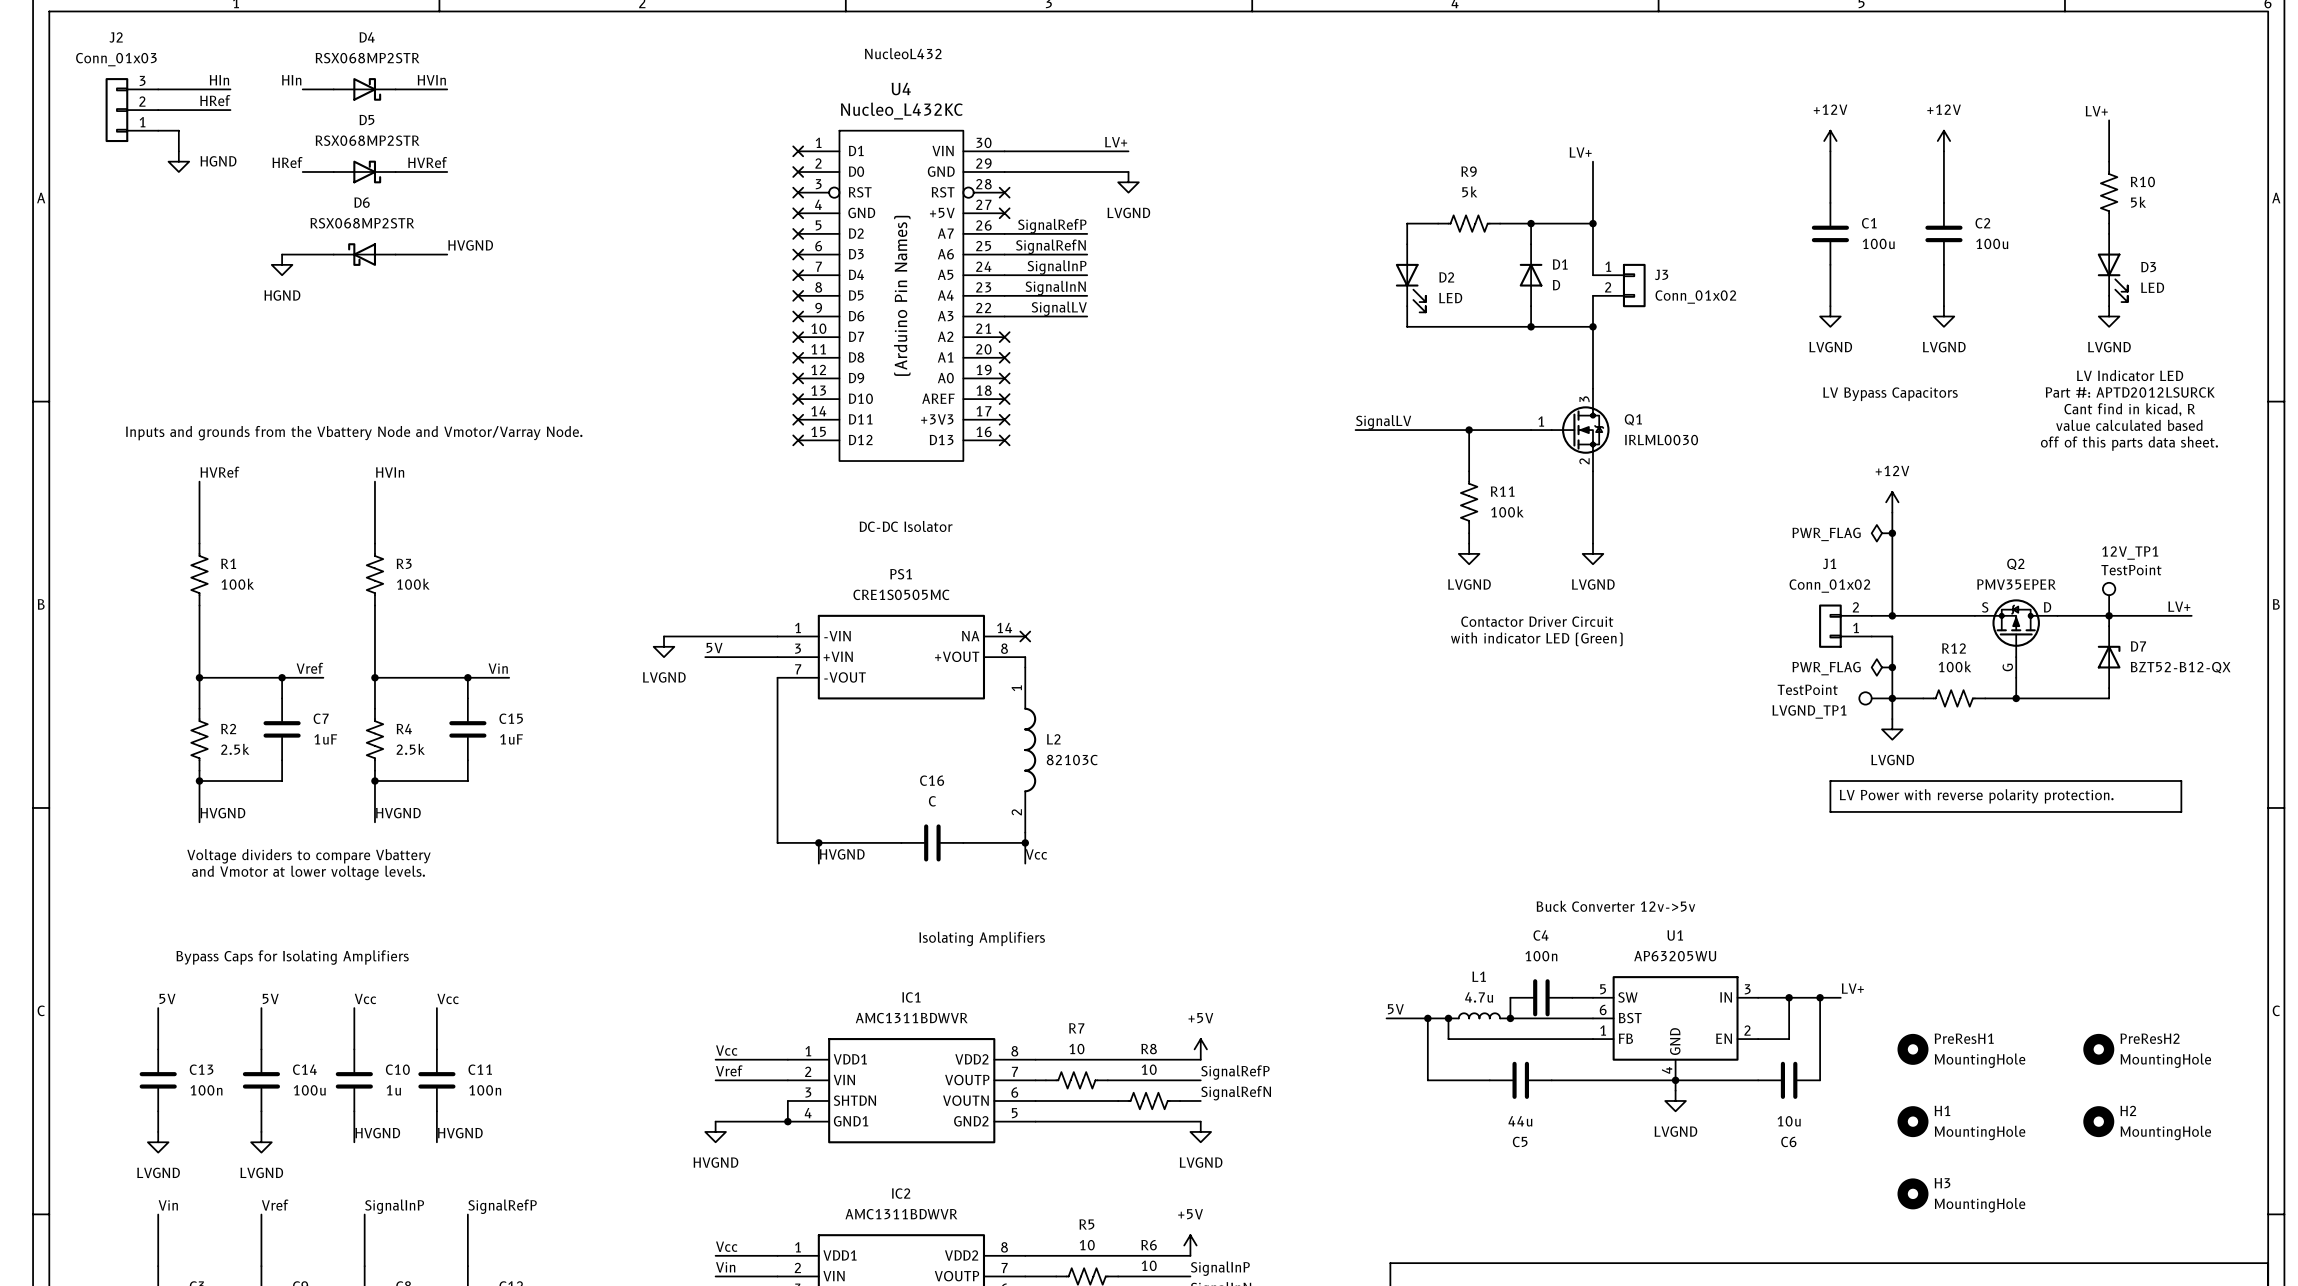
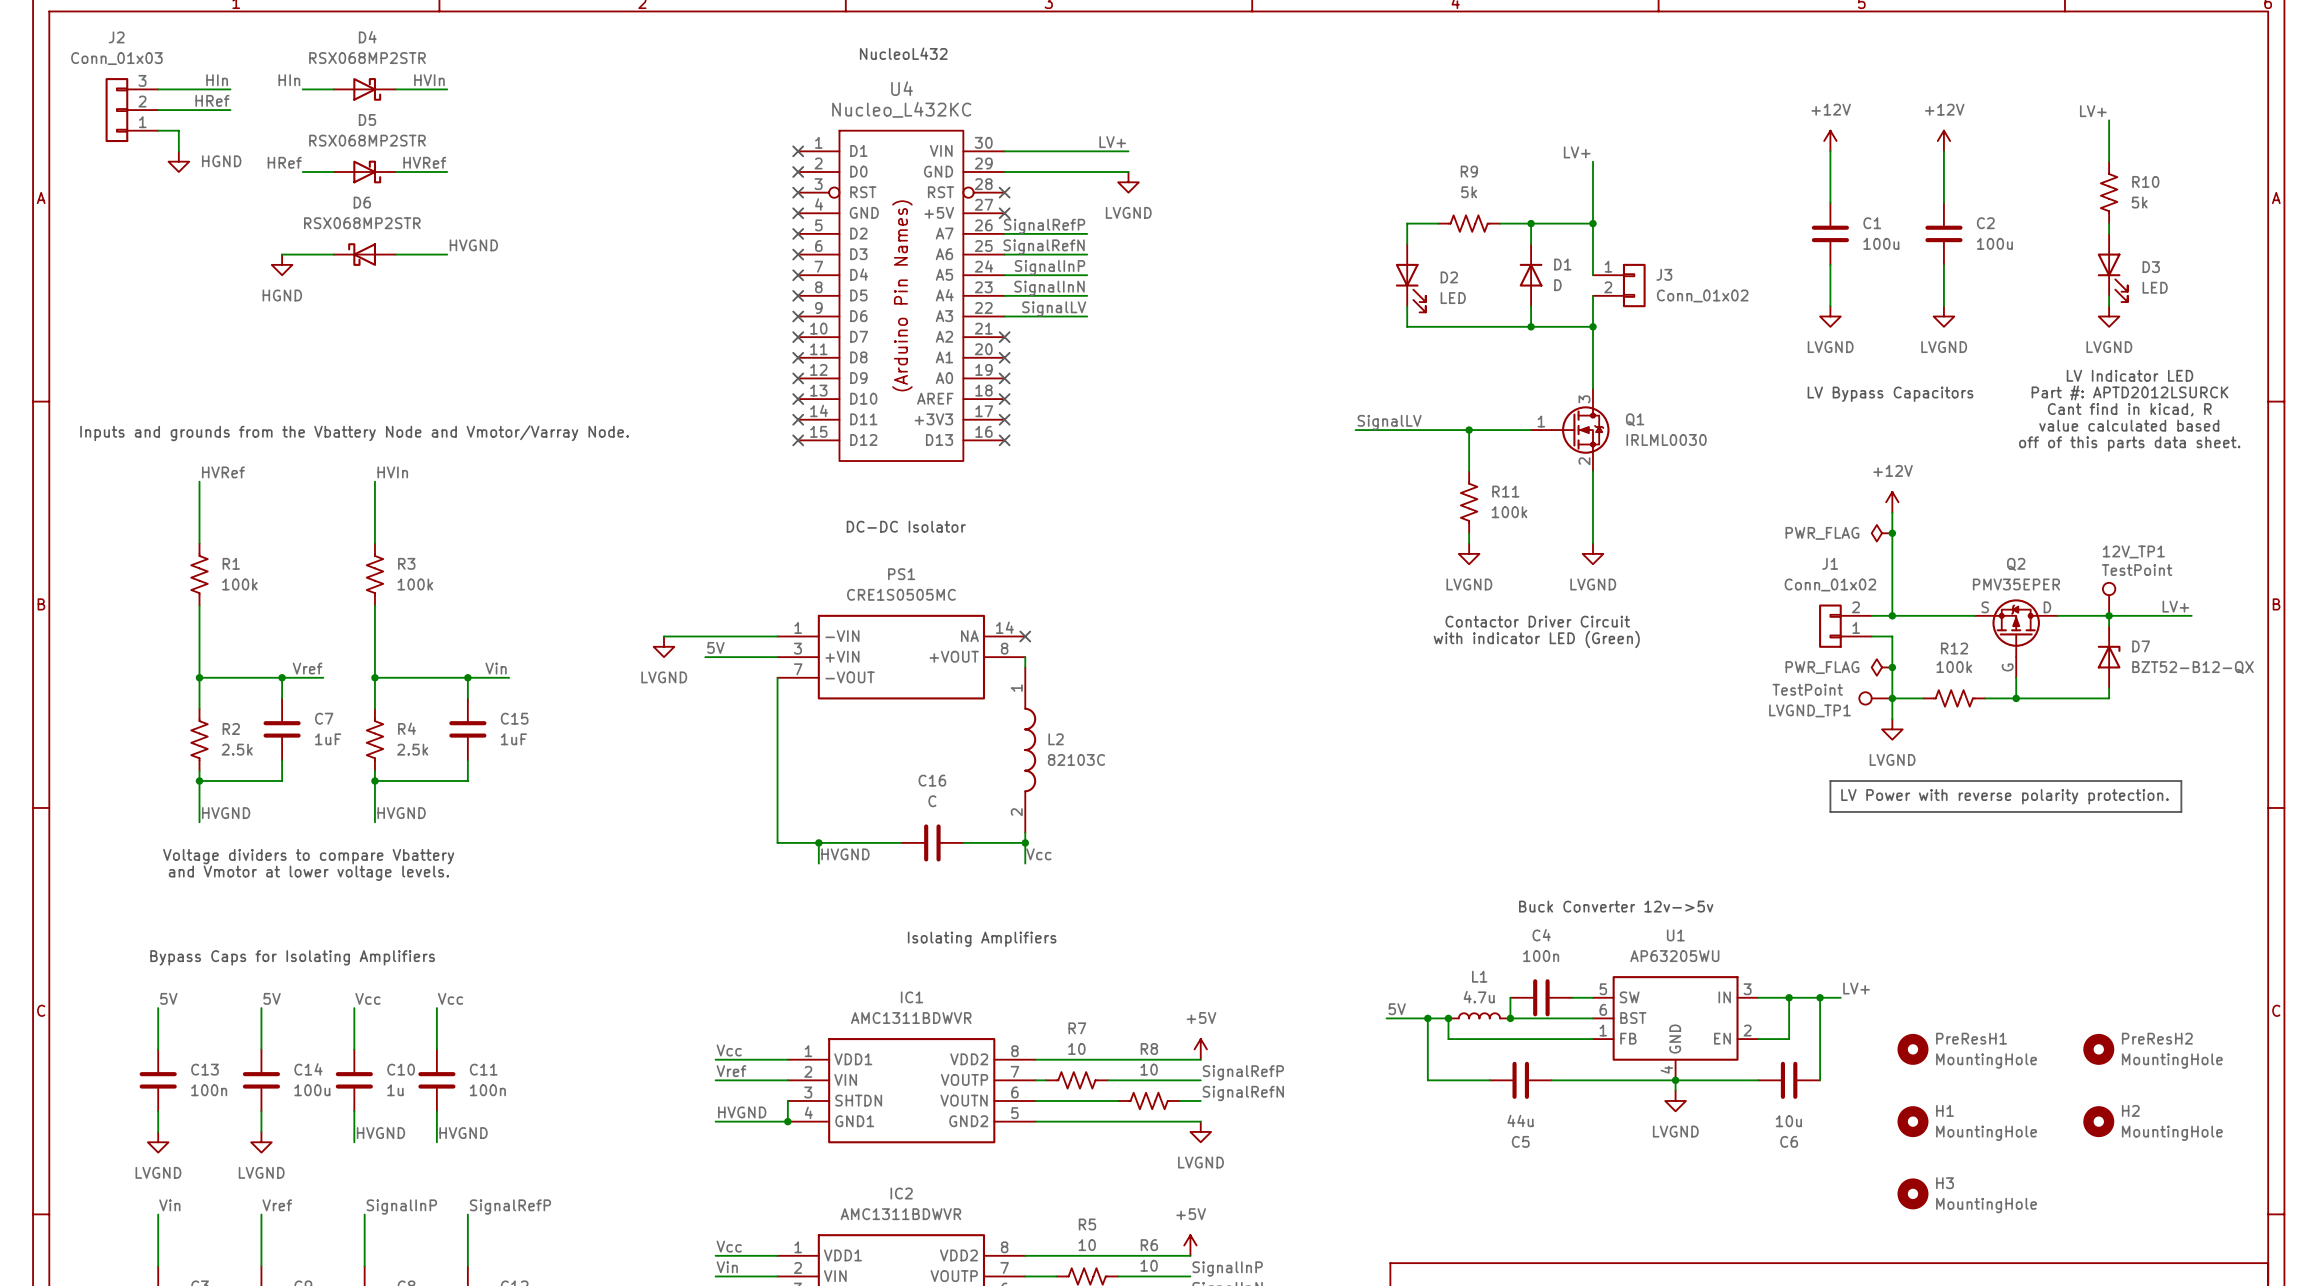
label: none -> HVGND (742, 1112)
power symbol: HVGND (715, 1131) -> none

